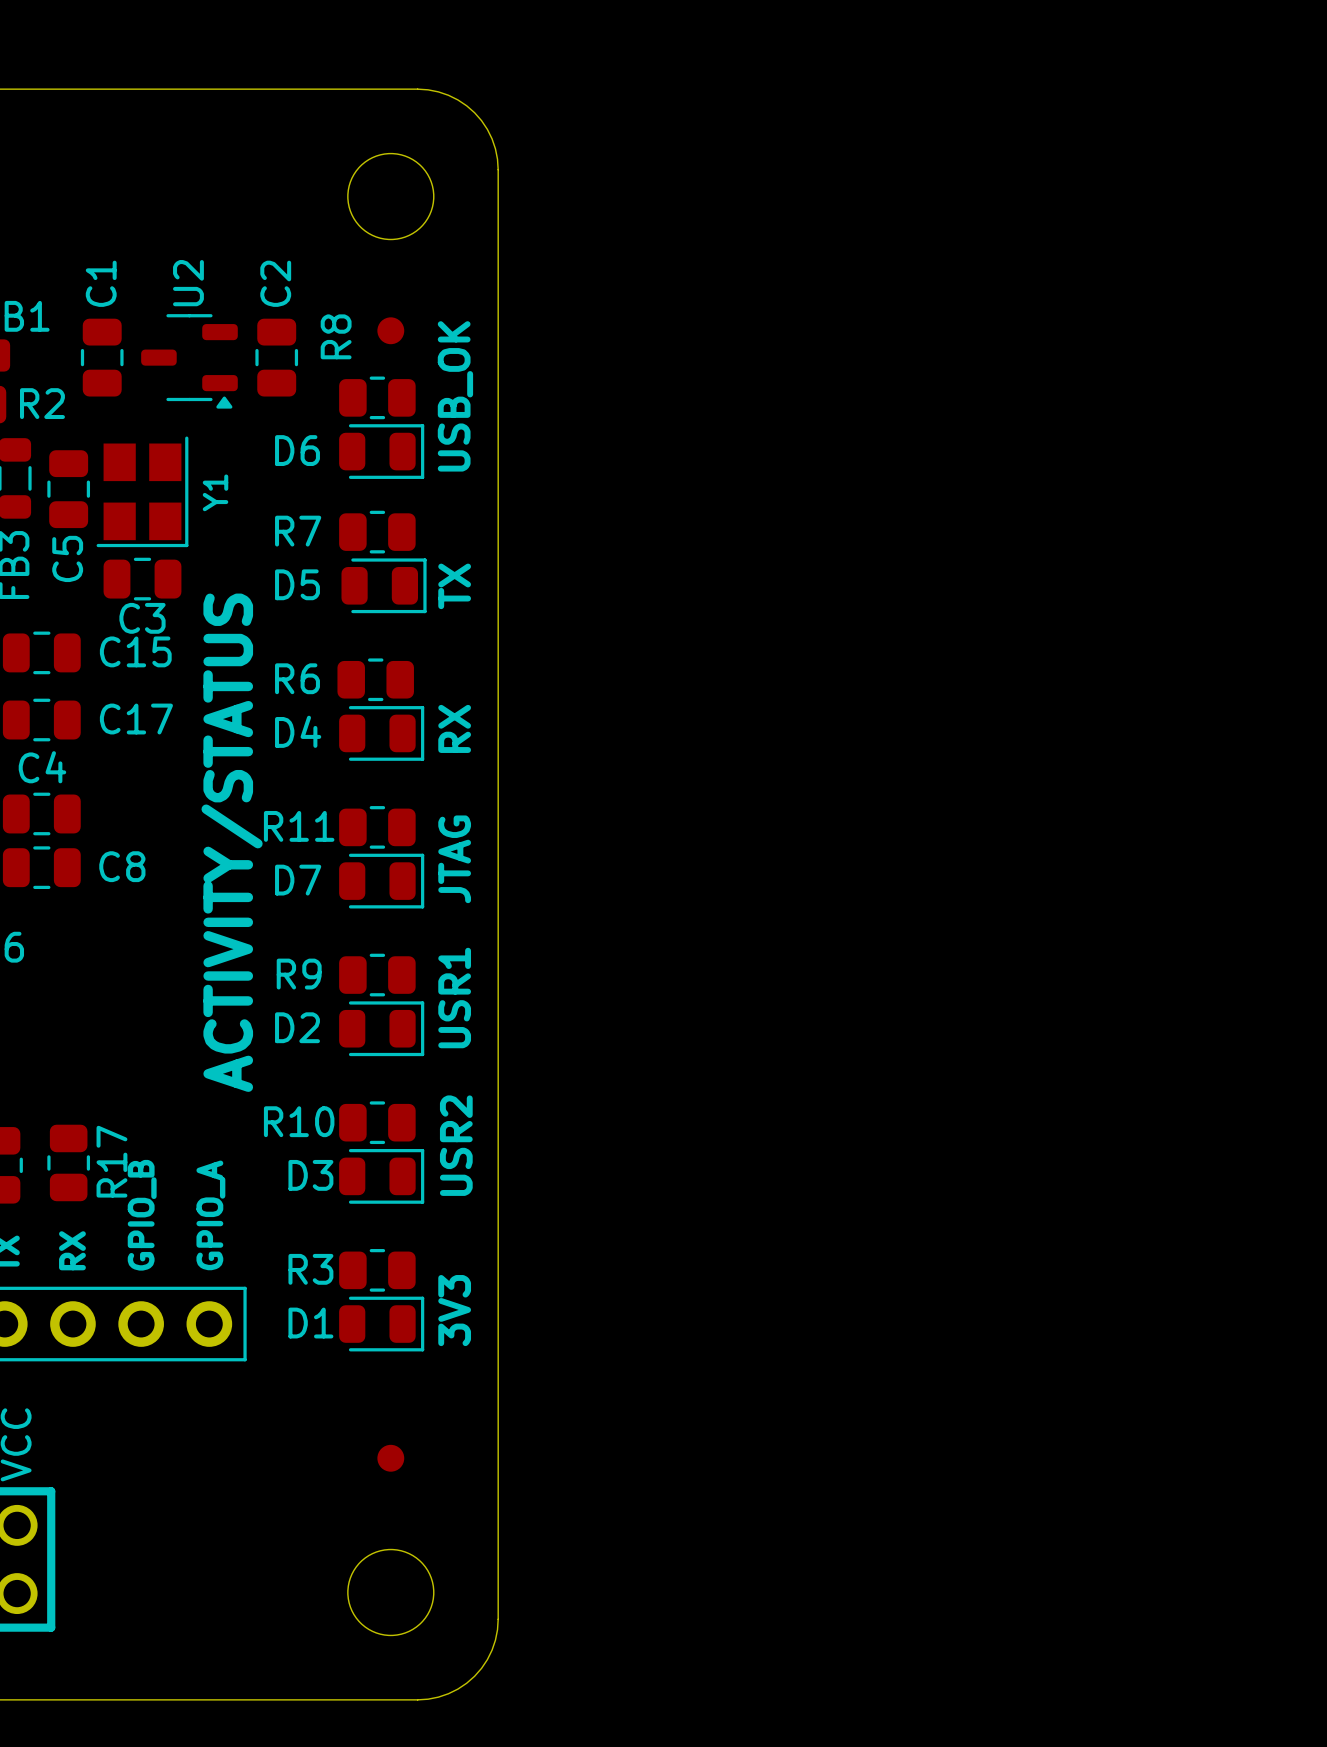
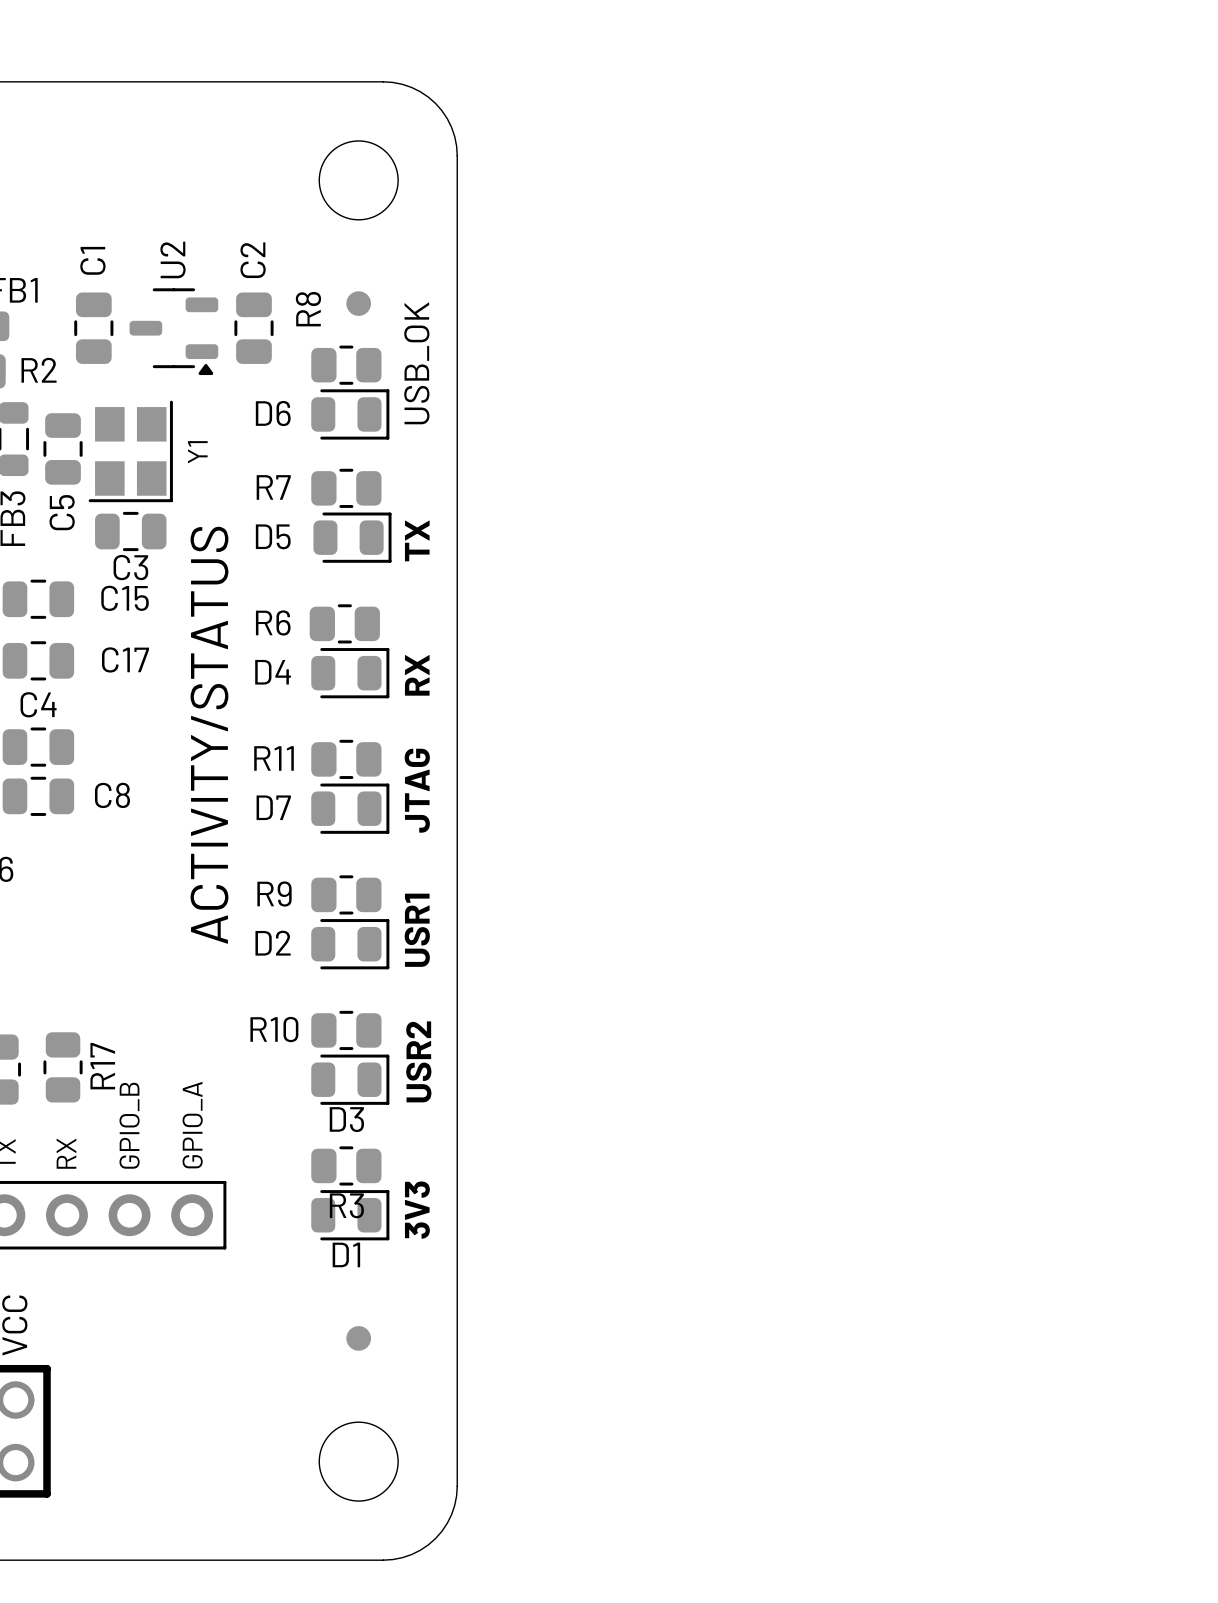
text position: ACTIVITY/STATUS (232, 842) -> ACTIVITY/STATUS (209, 735)
D3 name position: D3 (310, 1175) -> D3 (346, 1119)
R3 name position: R3 (310, 1269) -> R3 (346, 1205)
D1 name position: D1 (310, 1323) -> D1 (346, 1254)

